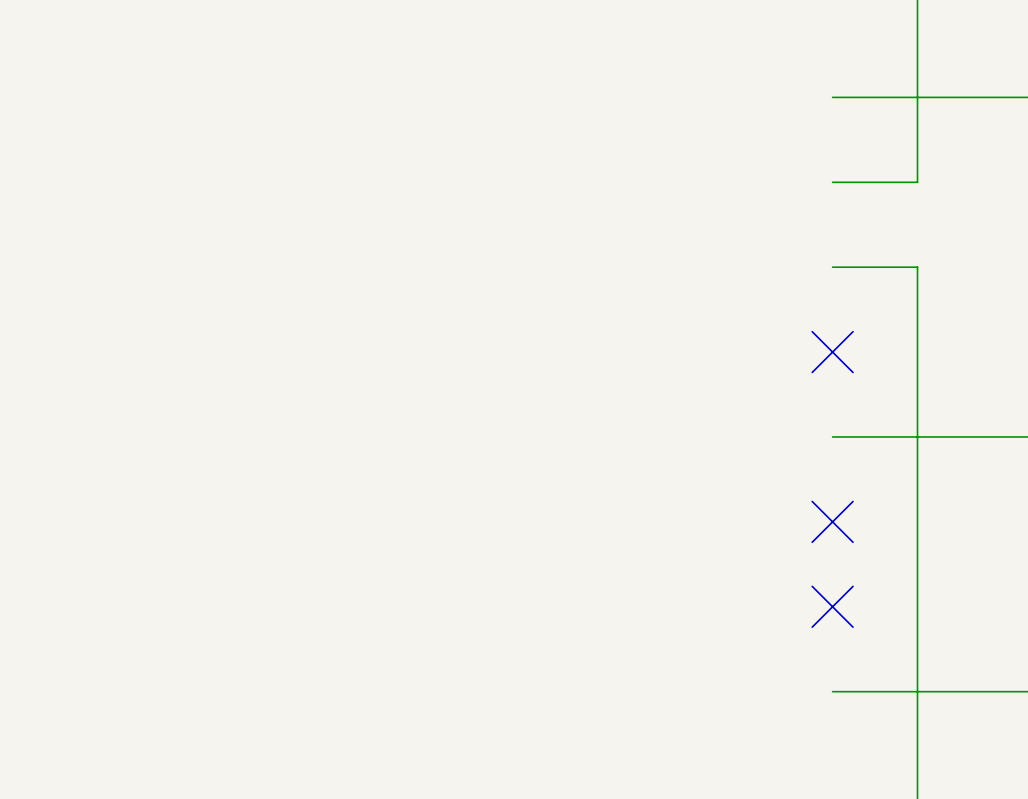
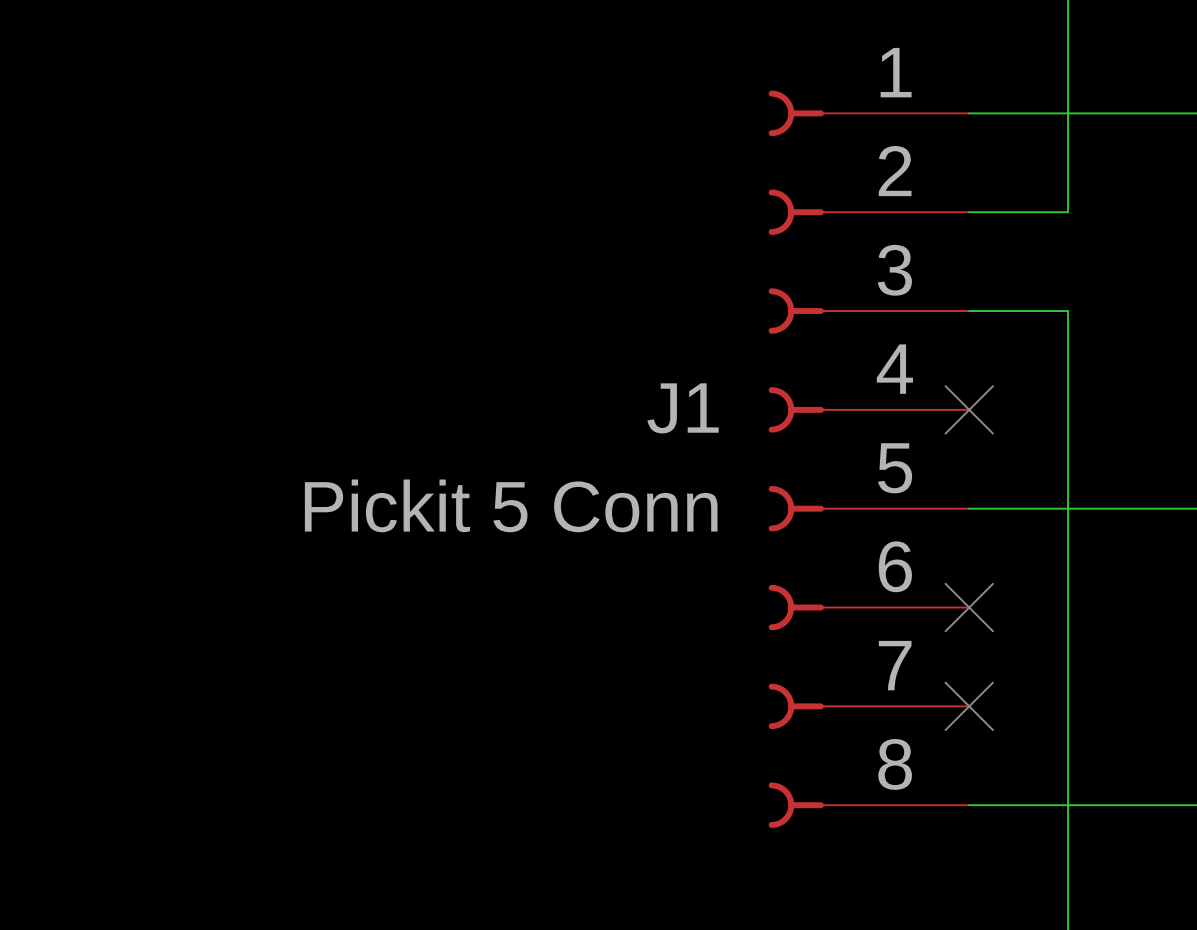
J1: none -> Pickit 5 Conn (868, 459)

